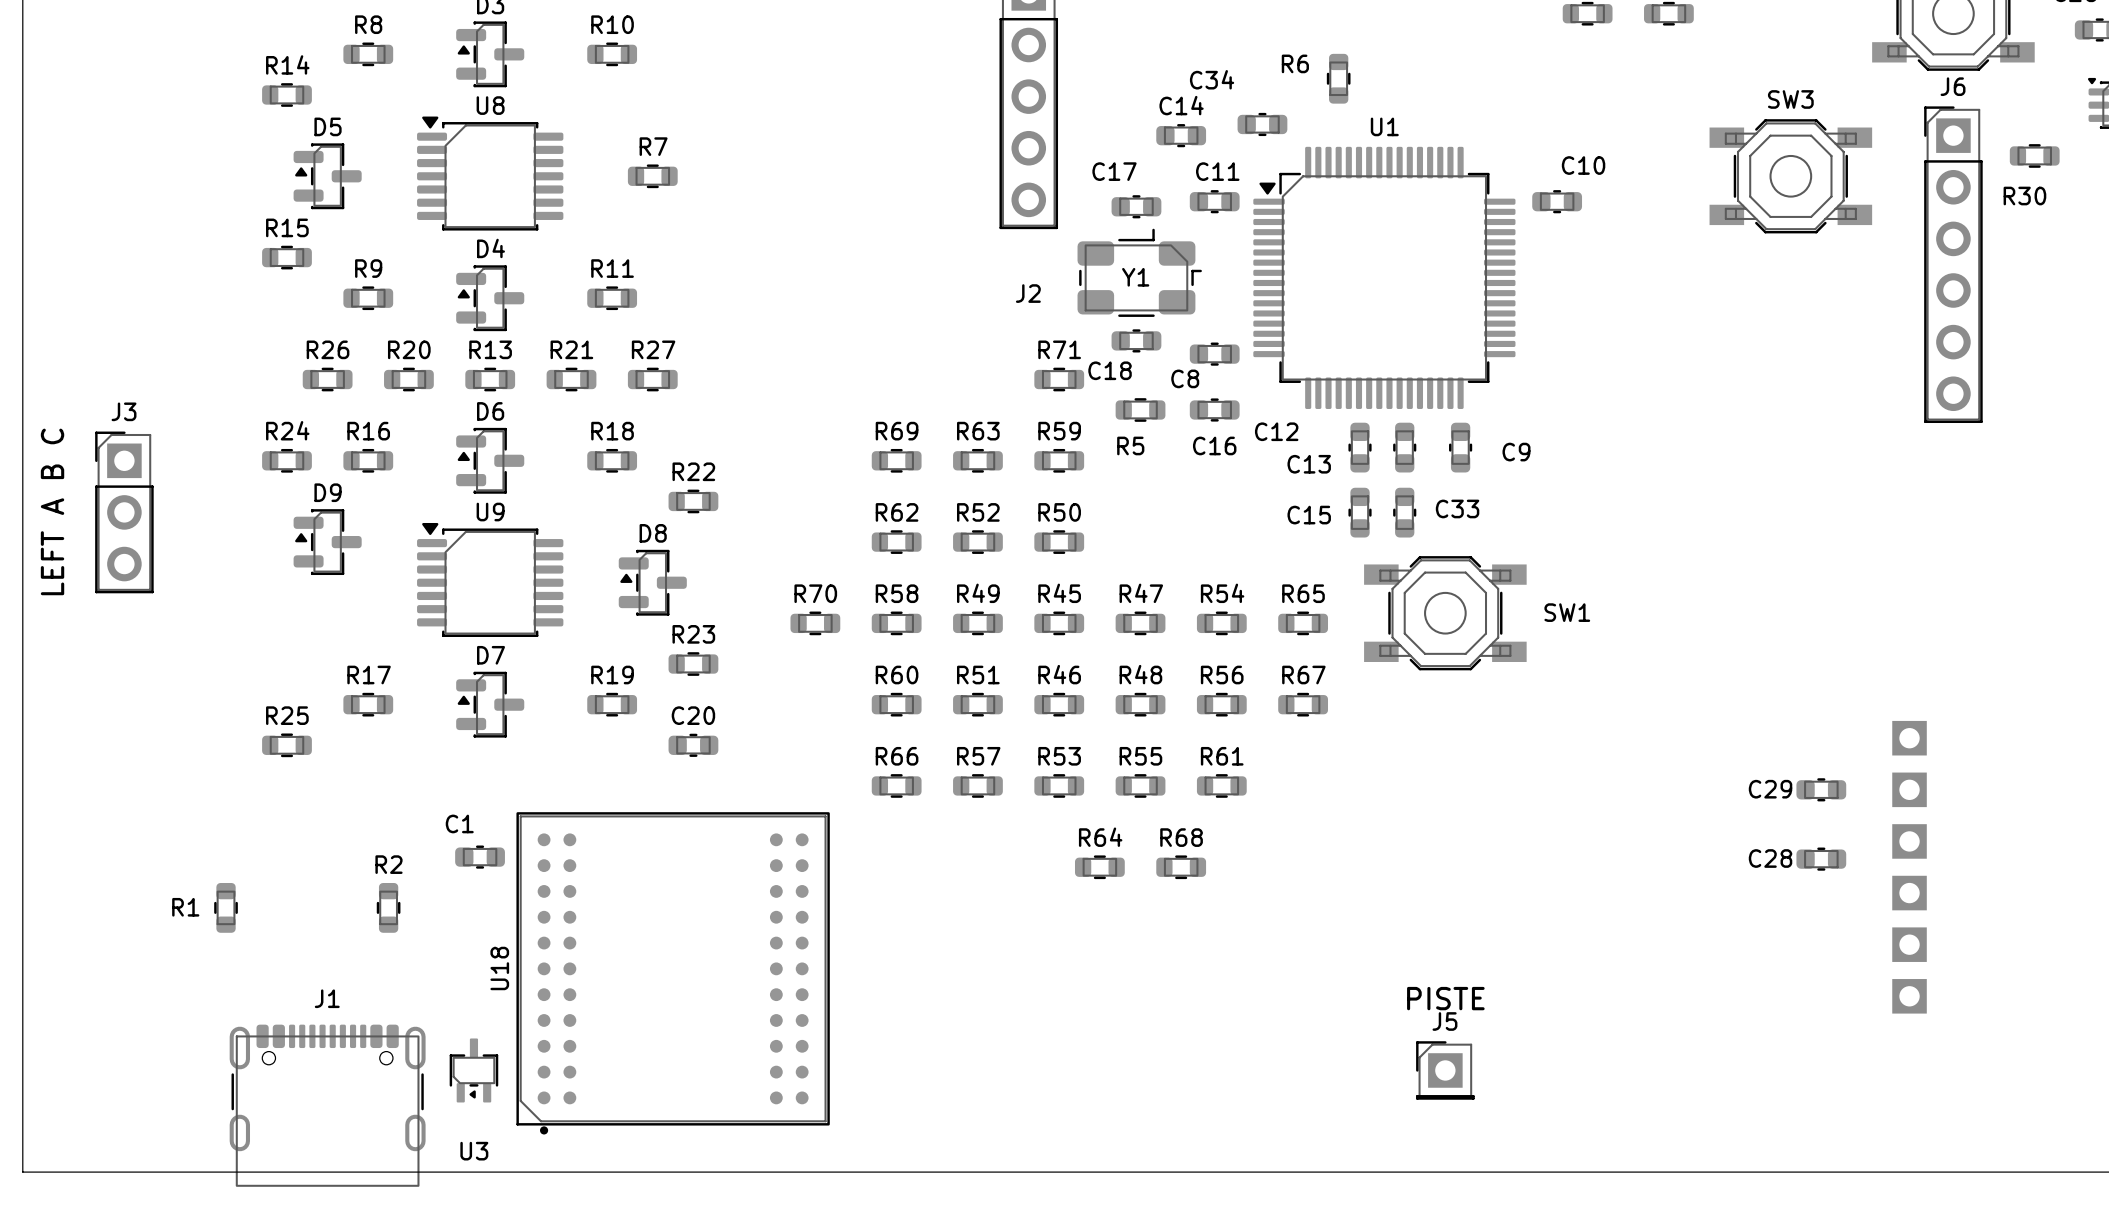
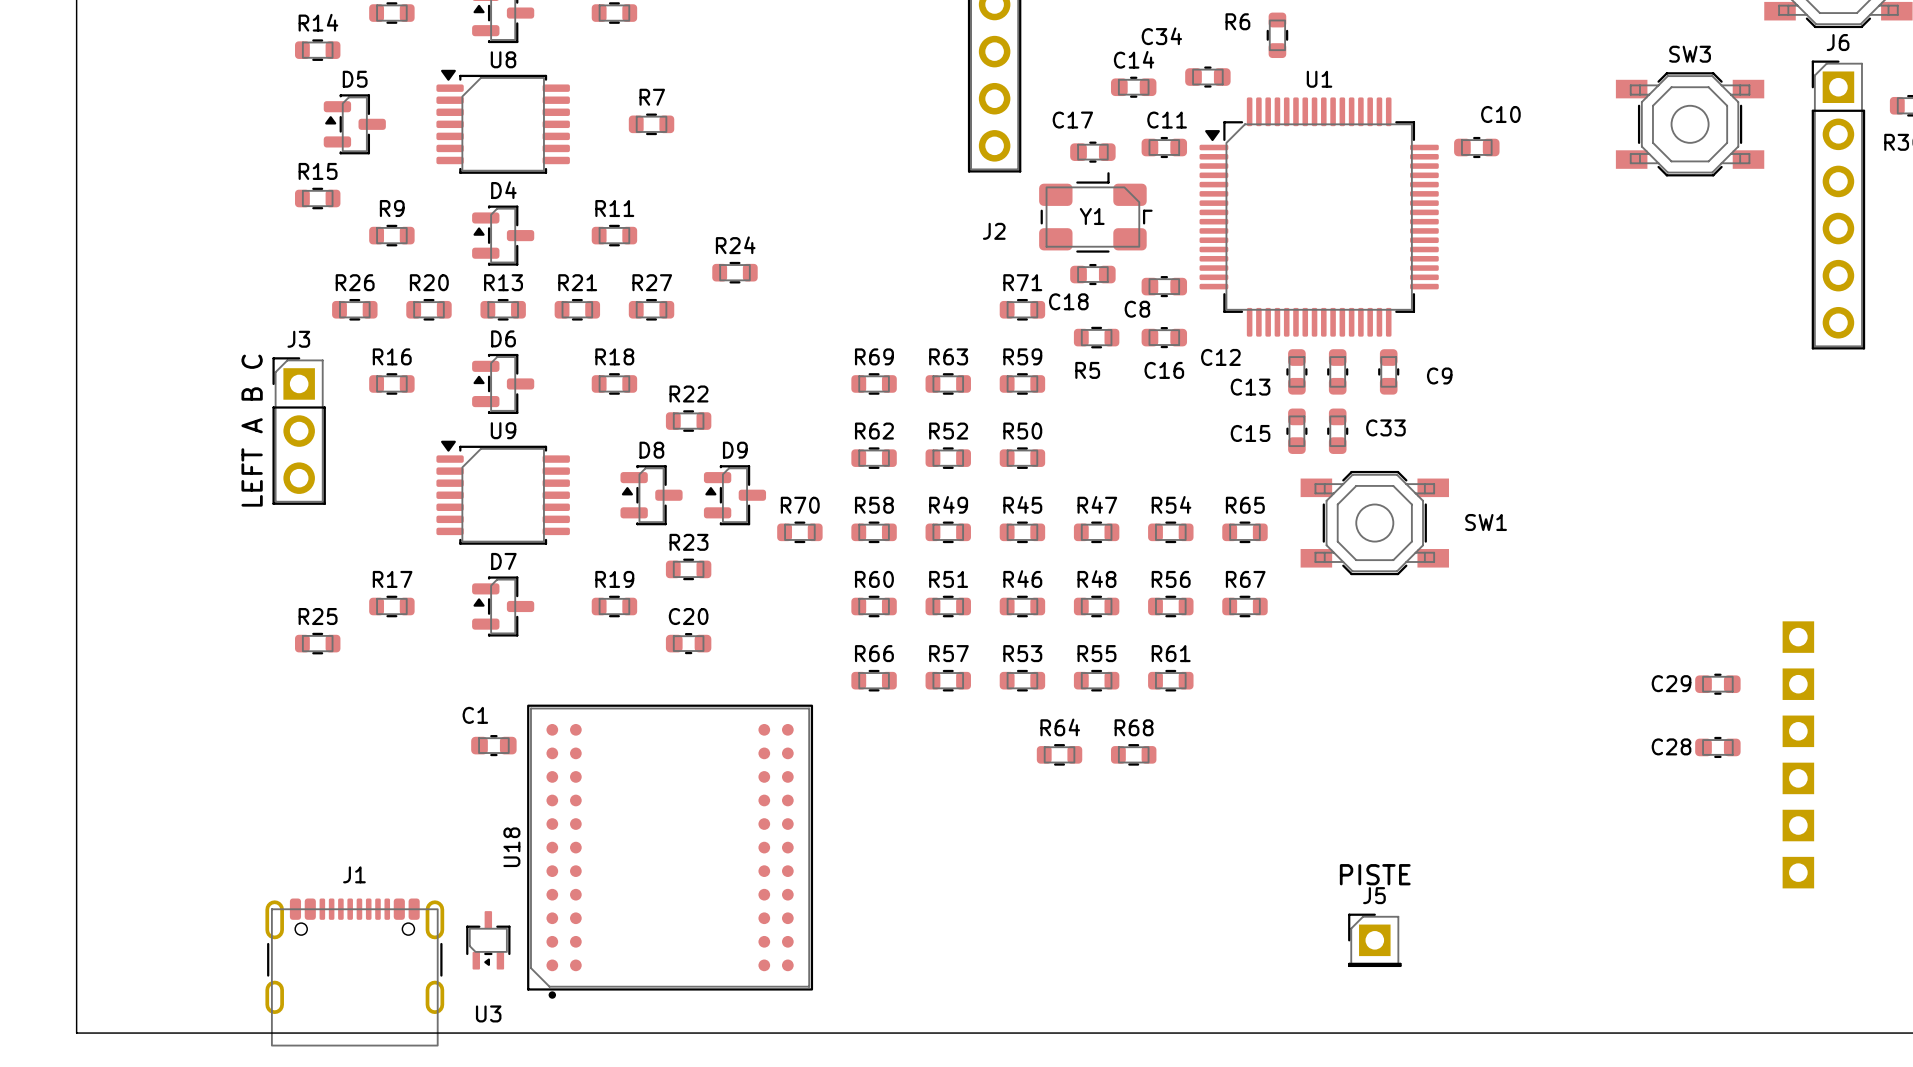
R24 position: (286, 460) -> (734, 272)
text position: LEFT A B C (52, 511) -> LEFT A B C (252, 430)
J3 position: (124, 512) -> (299, 431)
D9 position: (327, 542) -> (734, 495)
R1: (226, 907) -> none
R2: (388, 907) -> none

